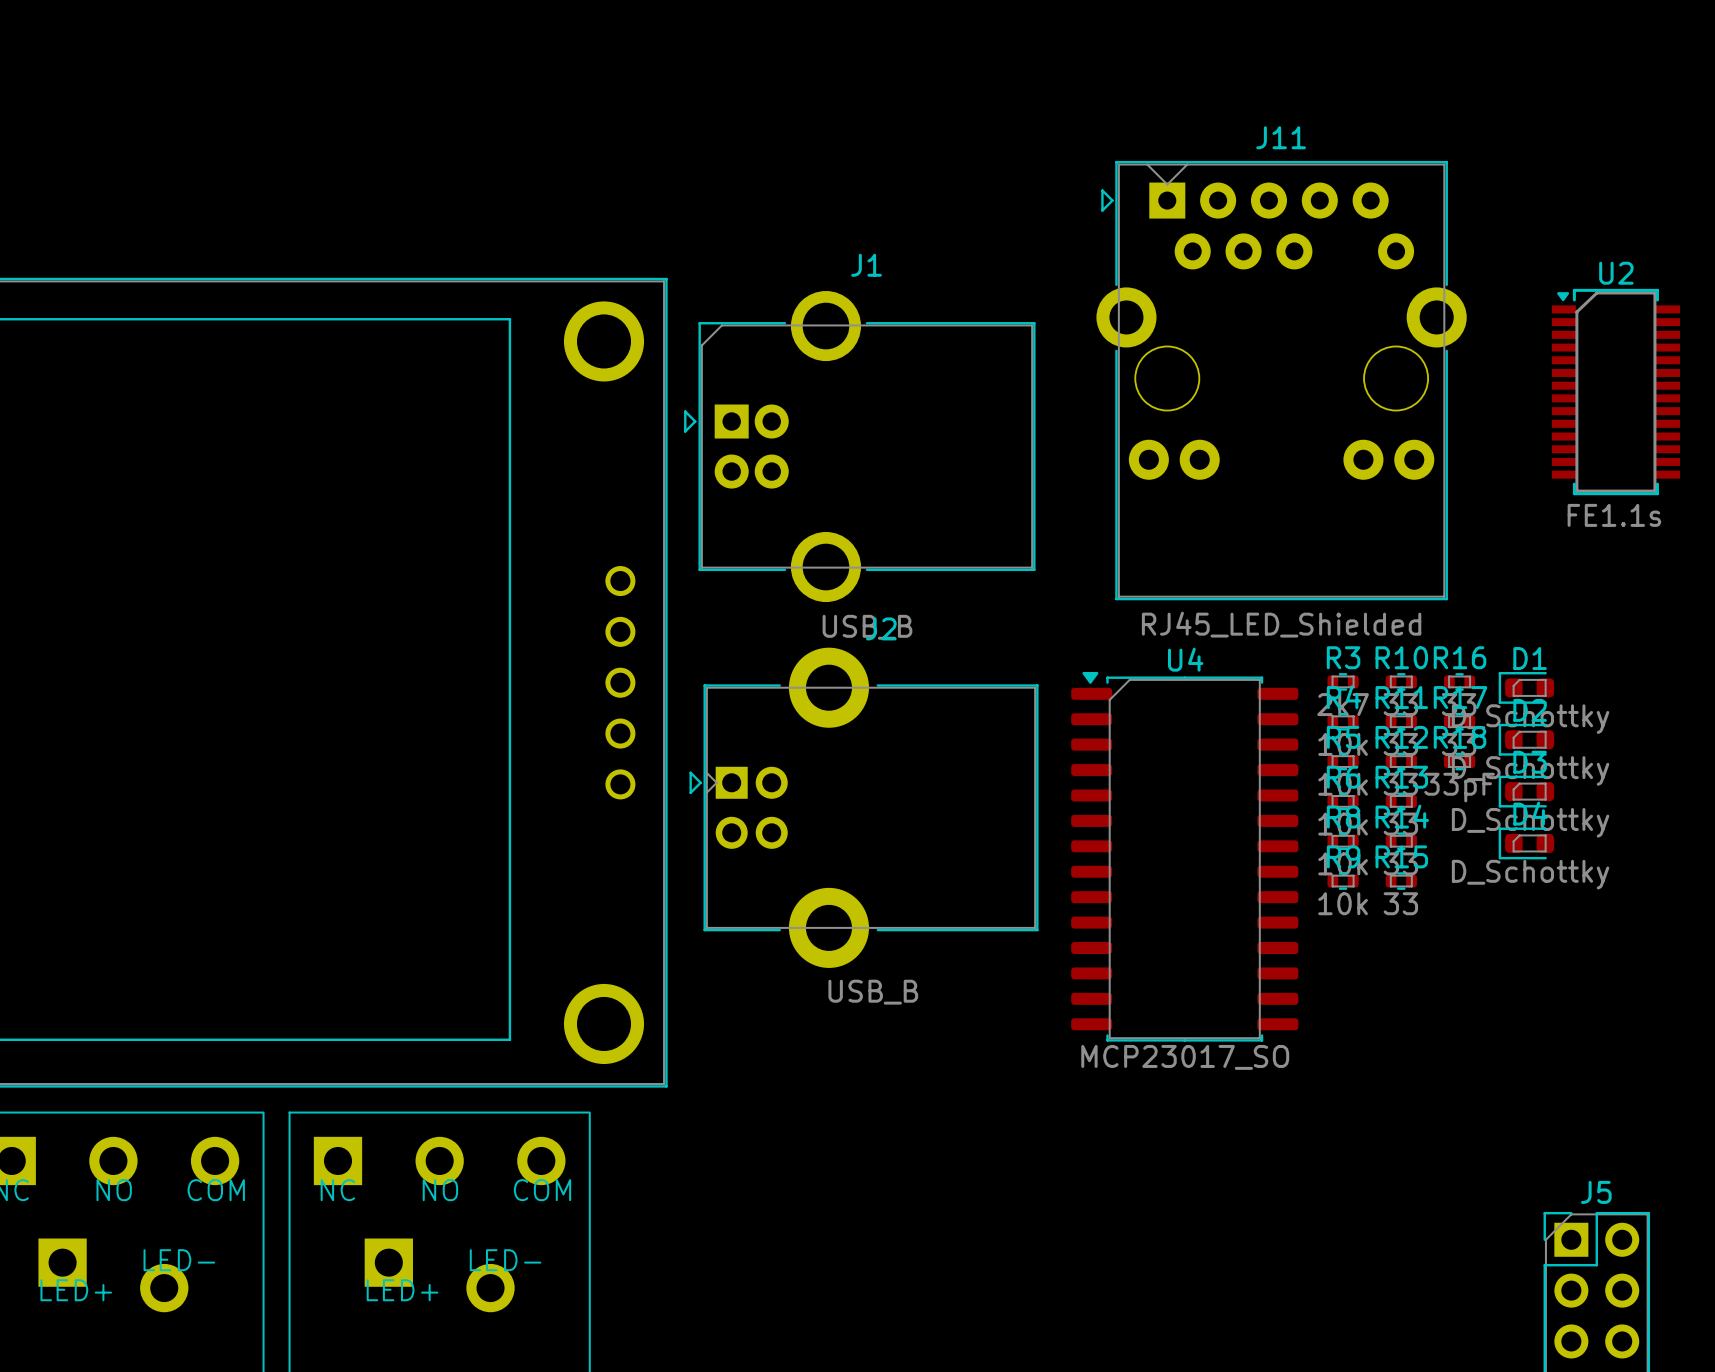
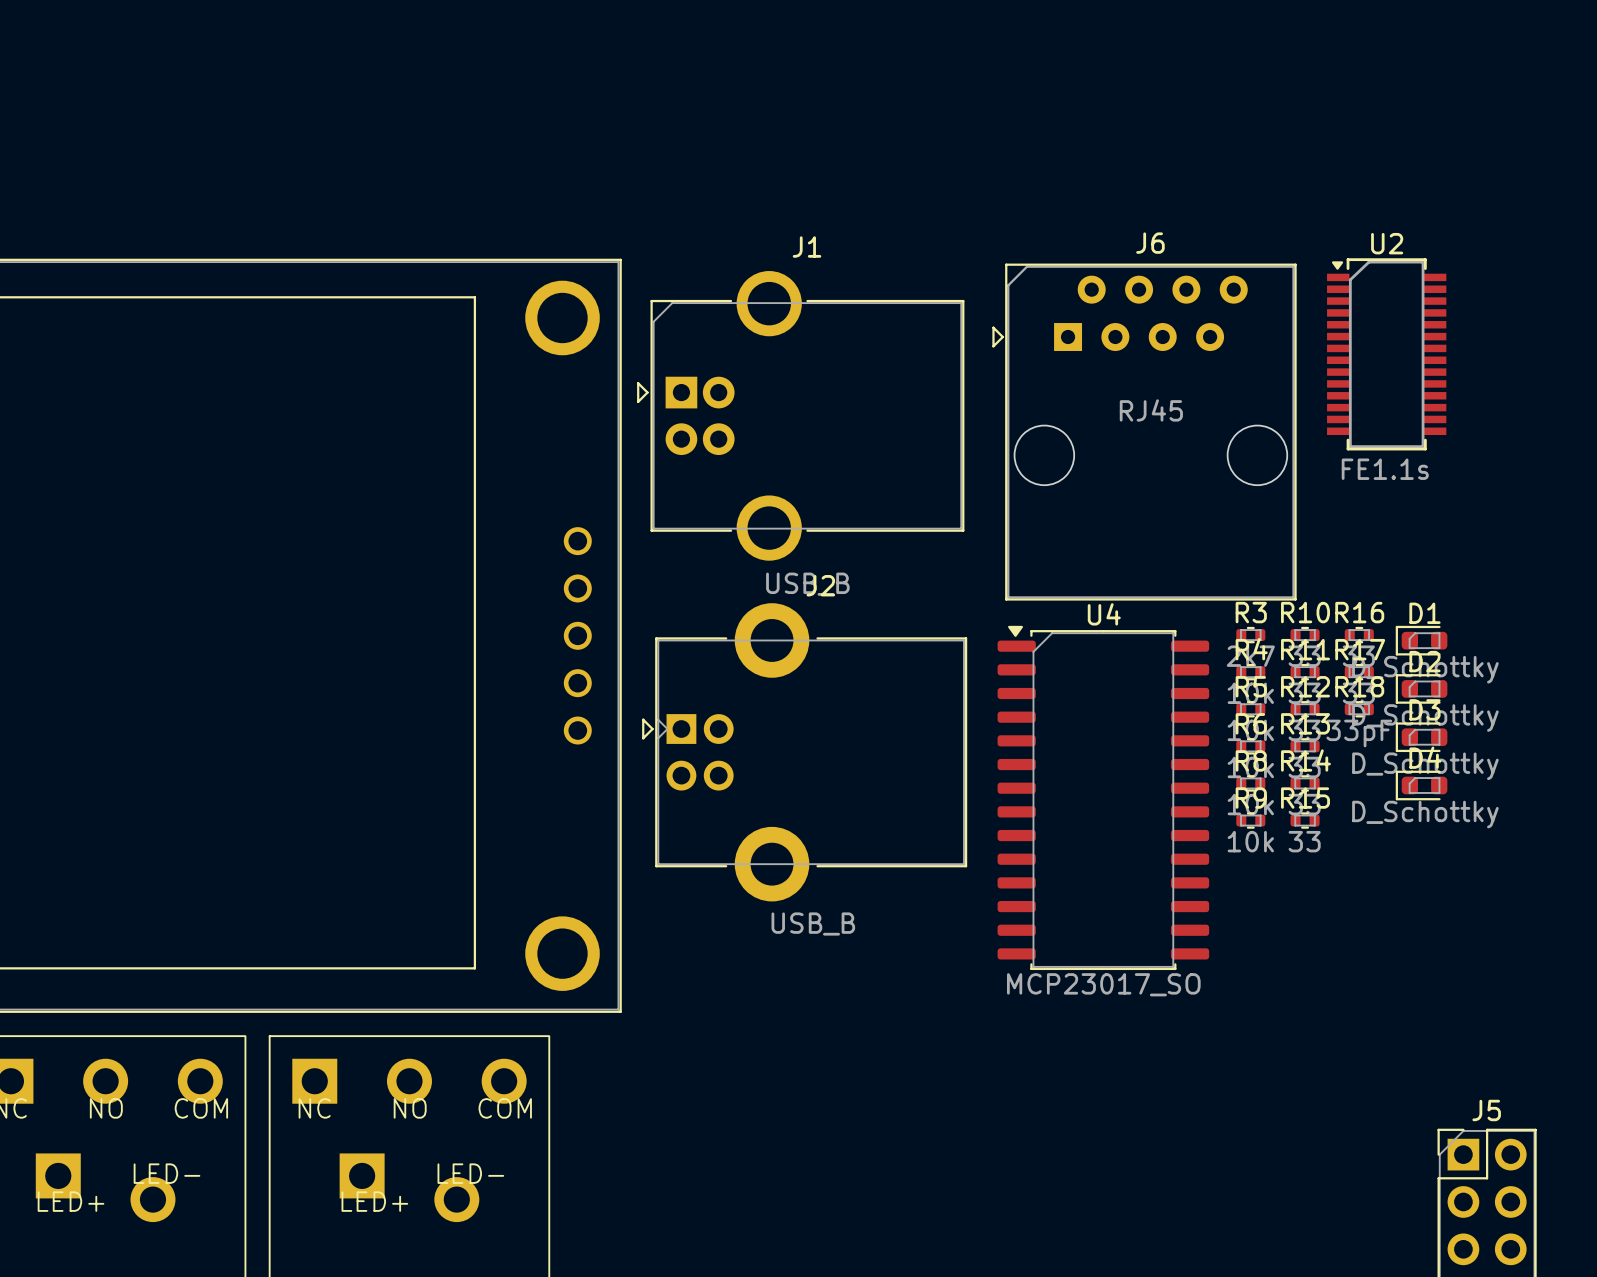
J11: RJ45_LED_Shielded (1281, 380) -> none
U2 position: (1615, 392) -> (1386, 354)
J6: none -> RJ45 (1144, 432)

